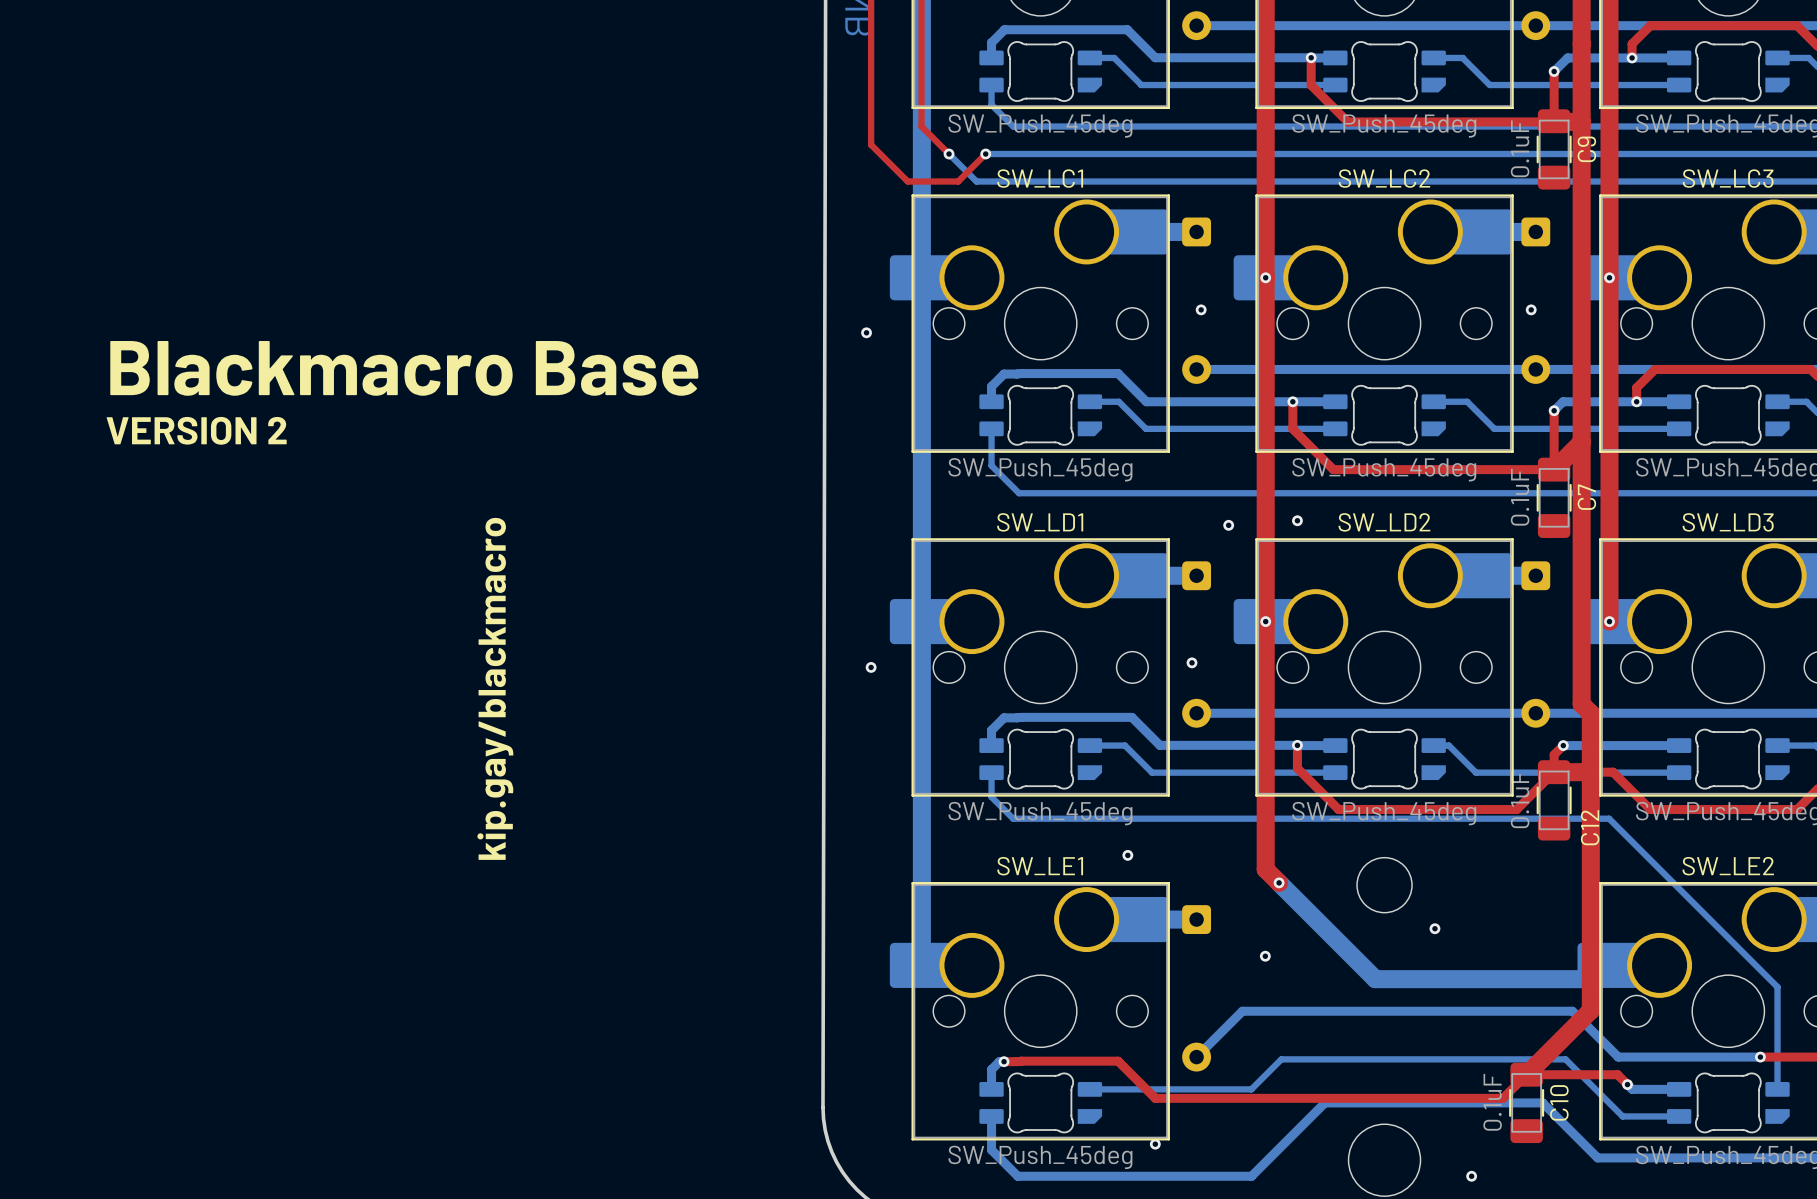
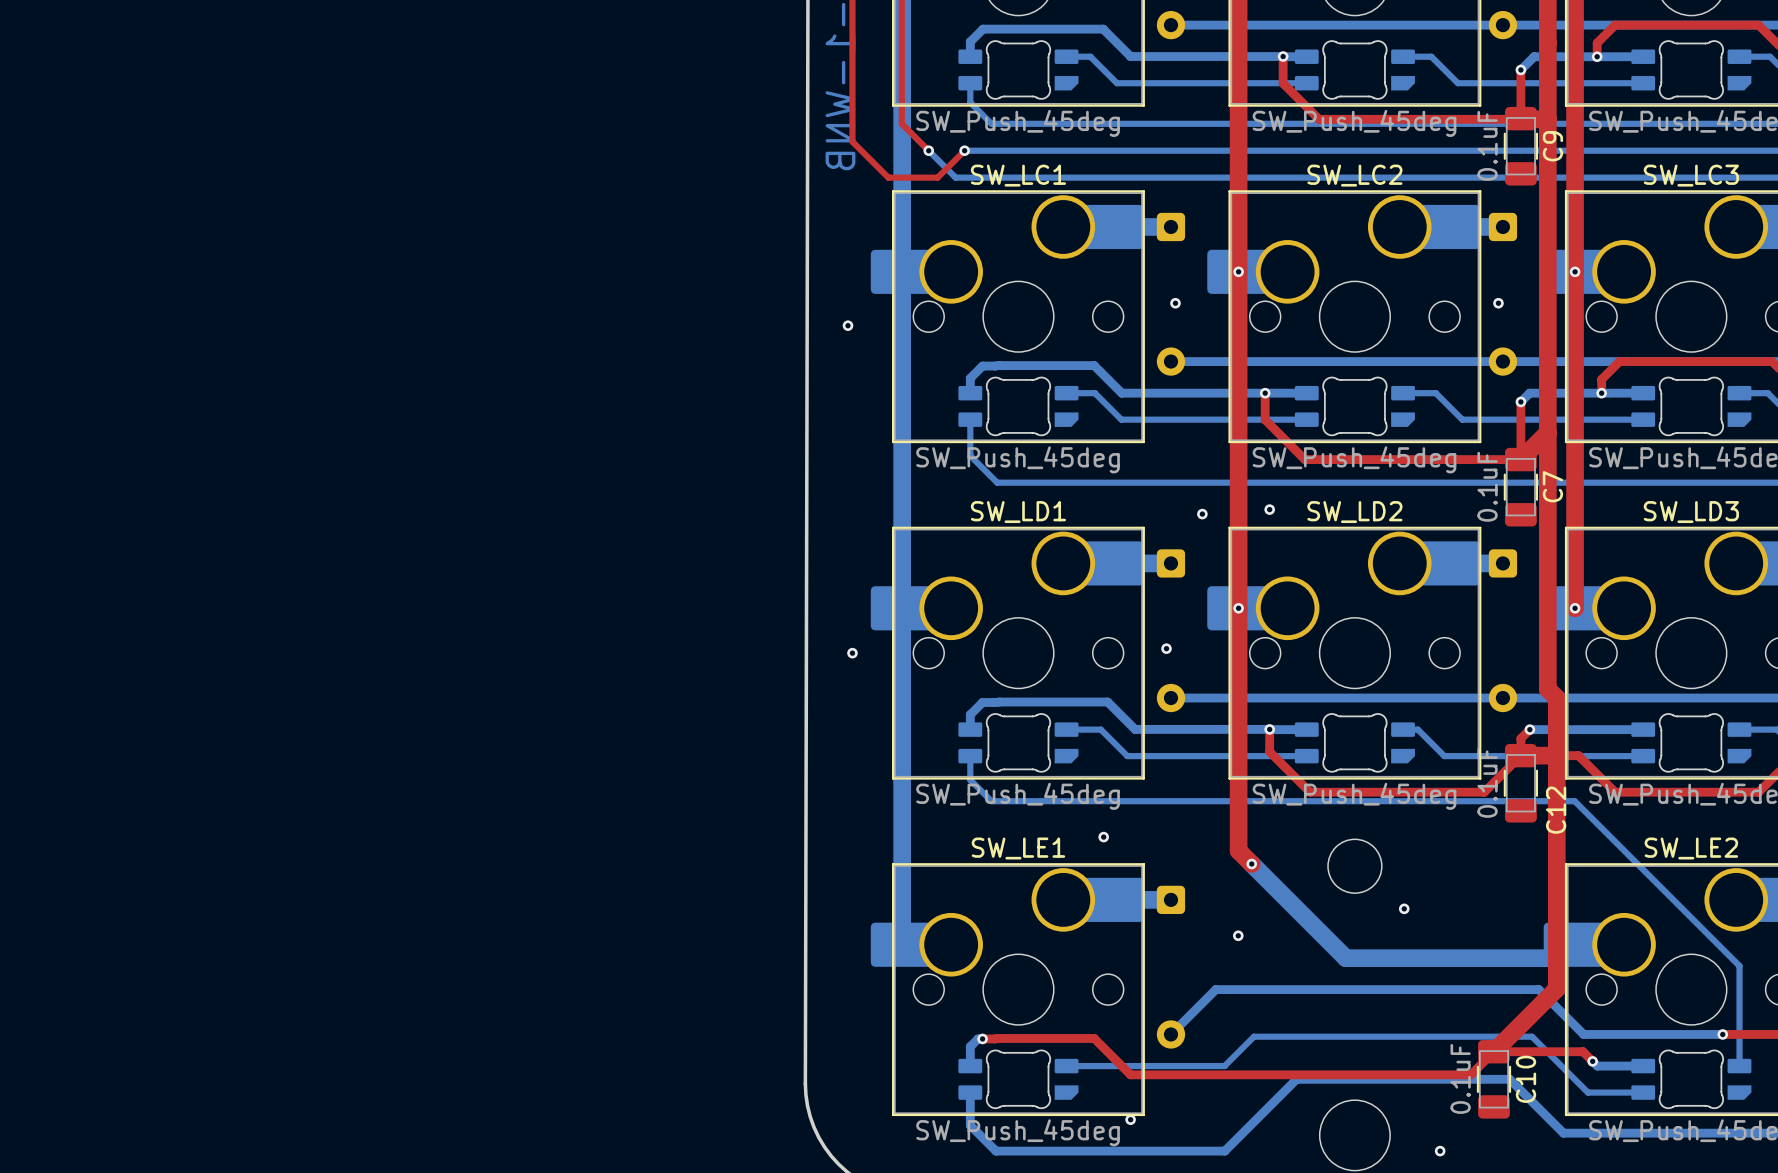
text: Blackmacro Base (404, 368) -> none
text: VERSION 2 (196, 430) -> none
text: kip.gay/blackmacro (495, 688) -> none

